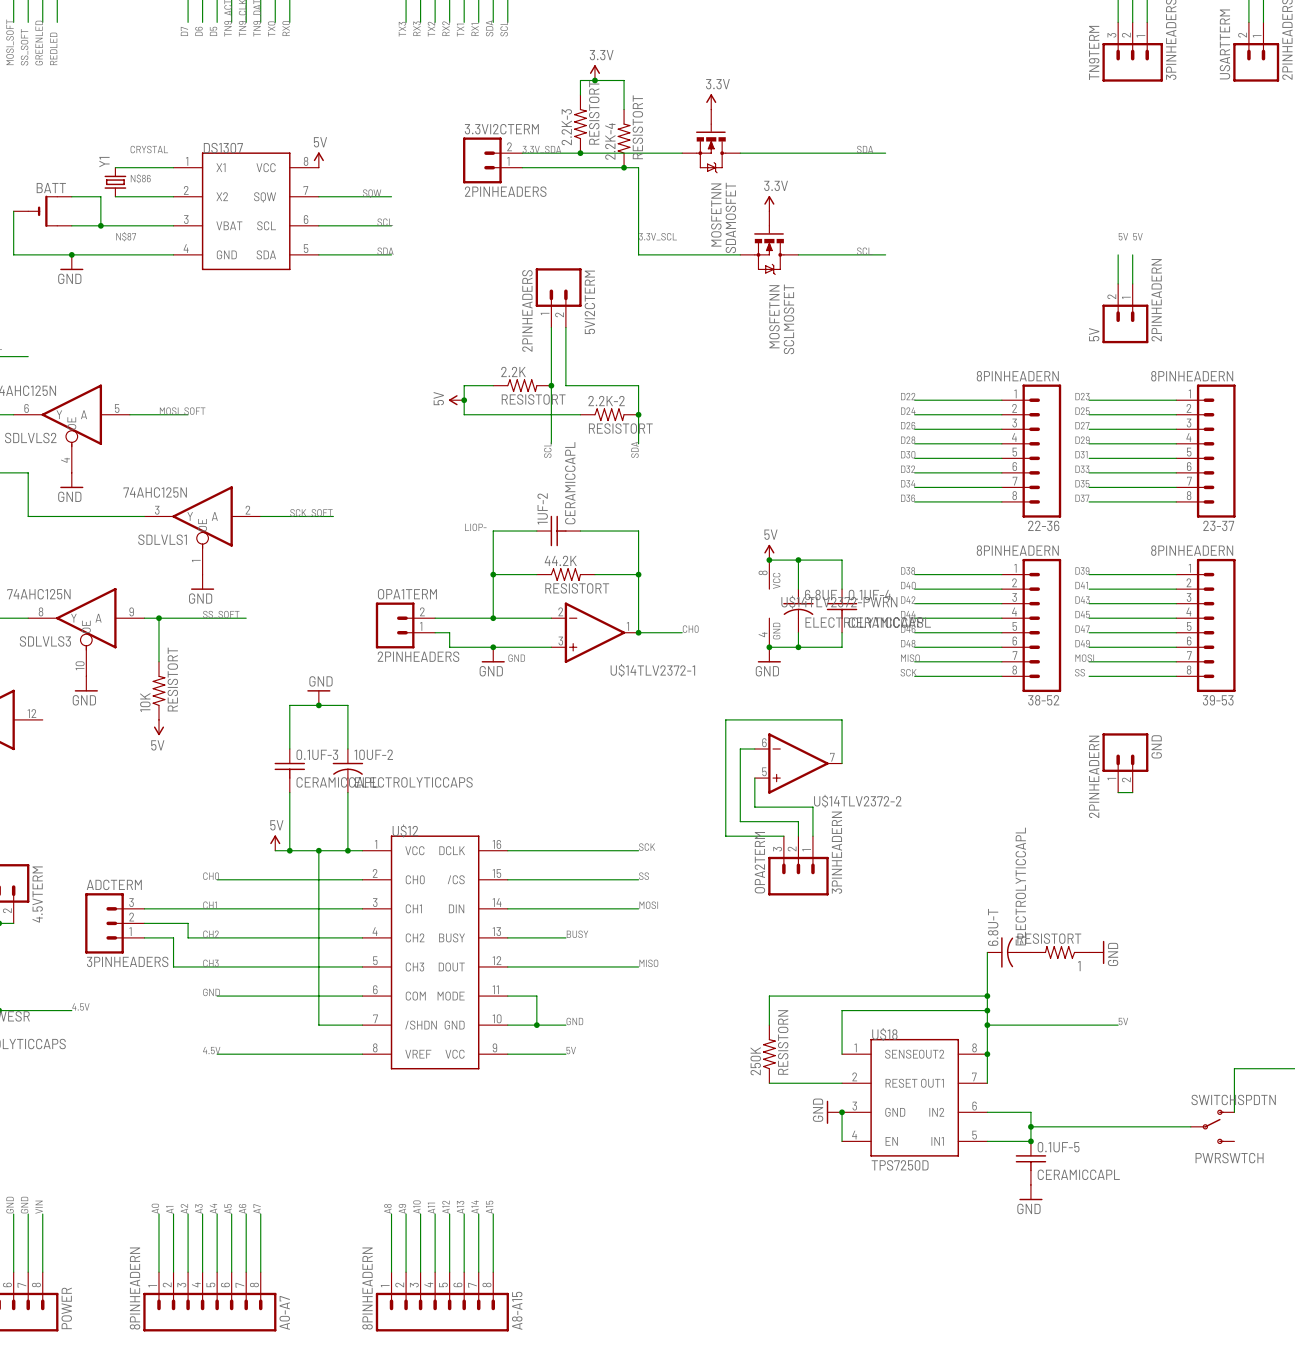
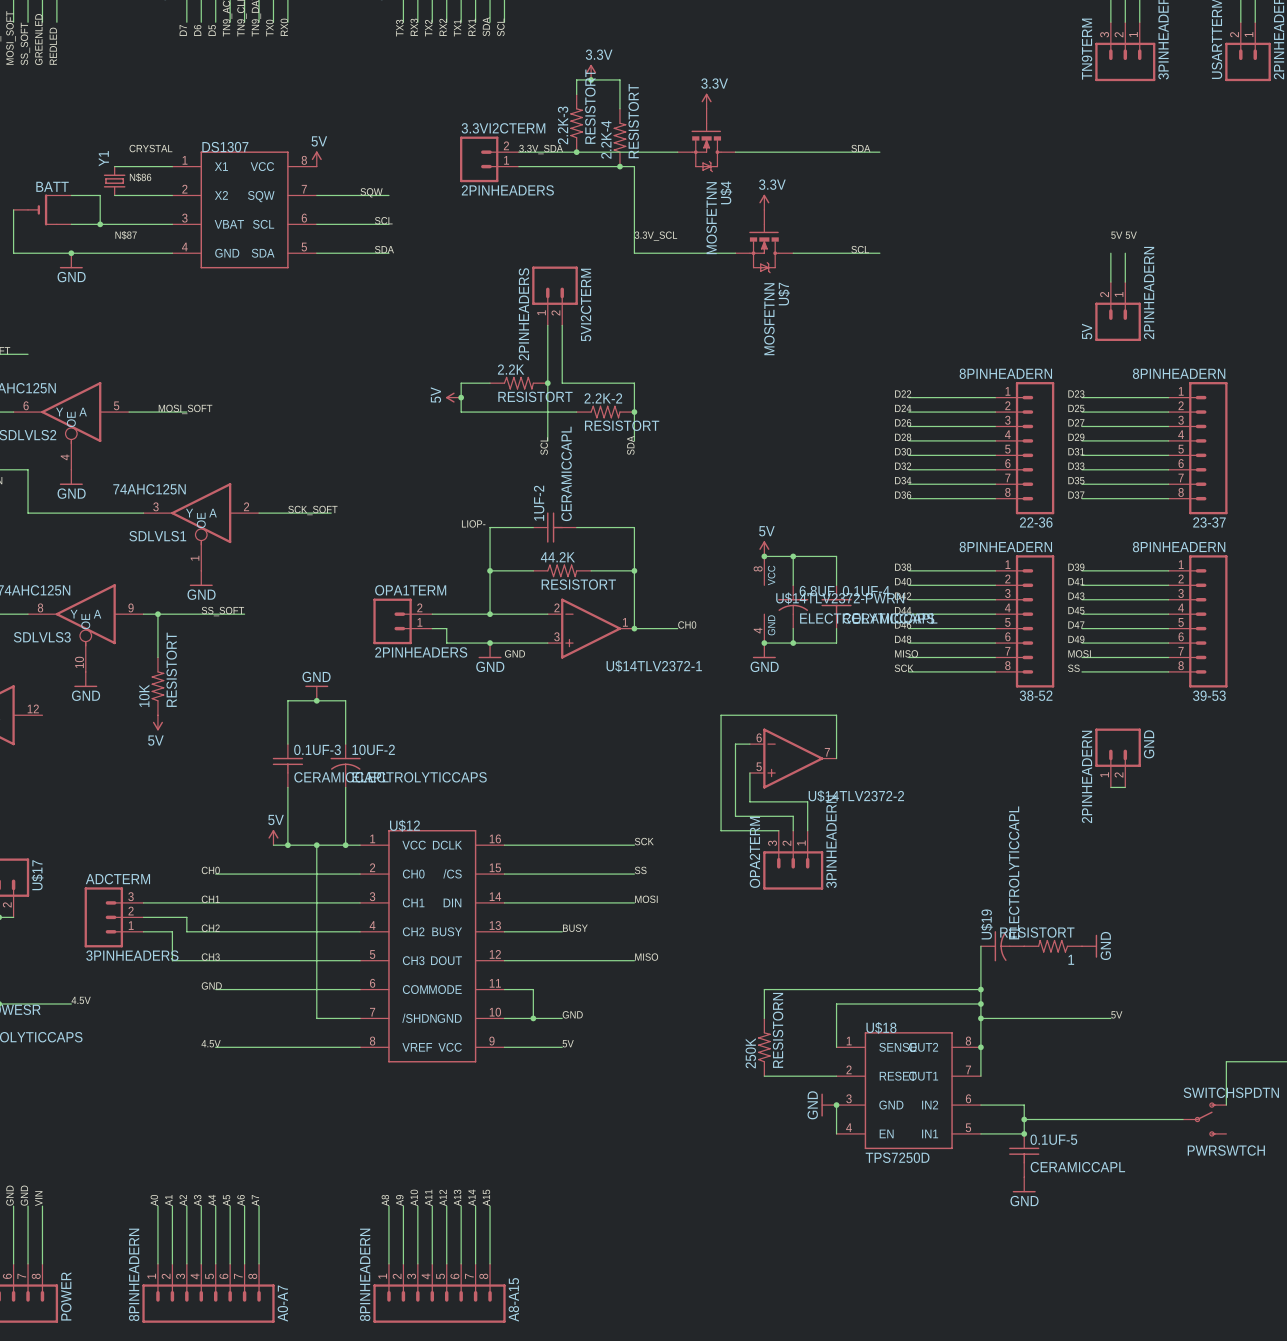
SDAMOSFET name: SDAMOSFET (730, 217) -> U$4 (726, 192)
SCLMOSFET name: SCLMOSFET (788, 319) -> U$7 (783, 294)
4.5VTERM name: 4.5VTERM (37, 894) -> U$17 (37, 875)
6.8U-T name: 6.8U-T (993, 927) -> U$19 (986, 924)

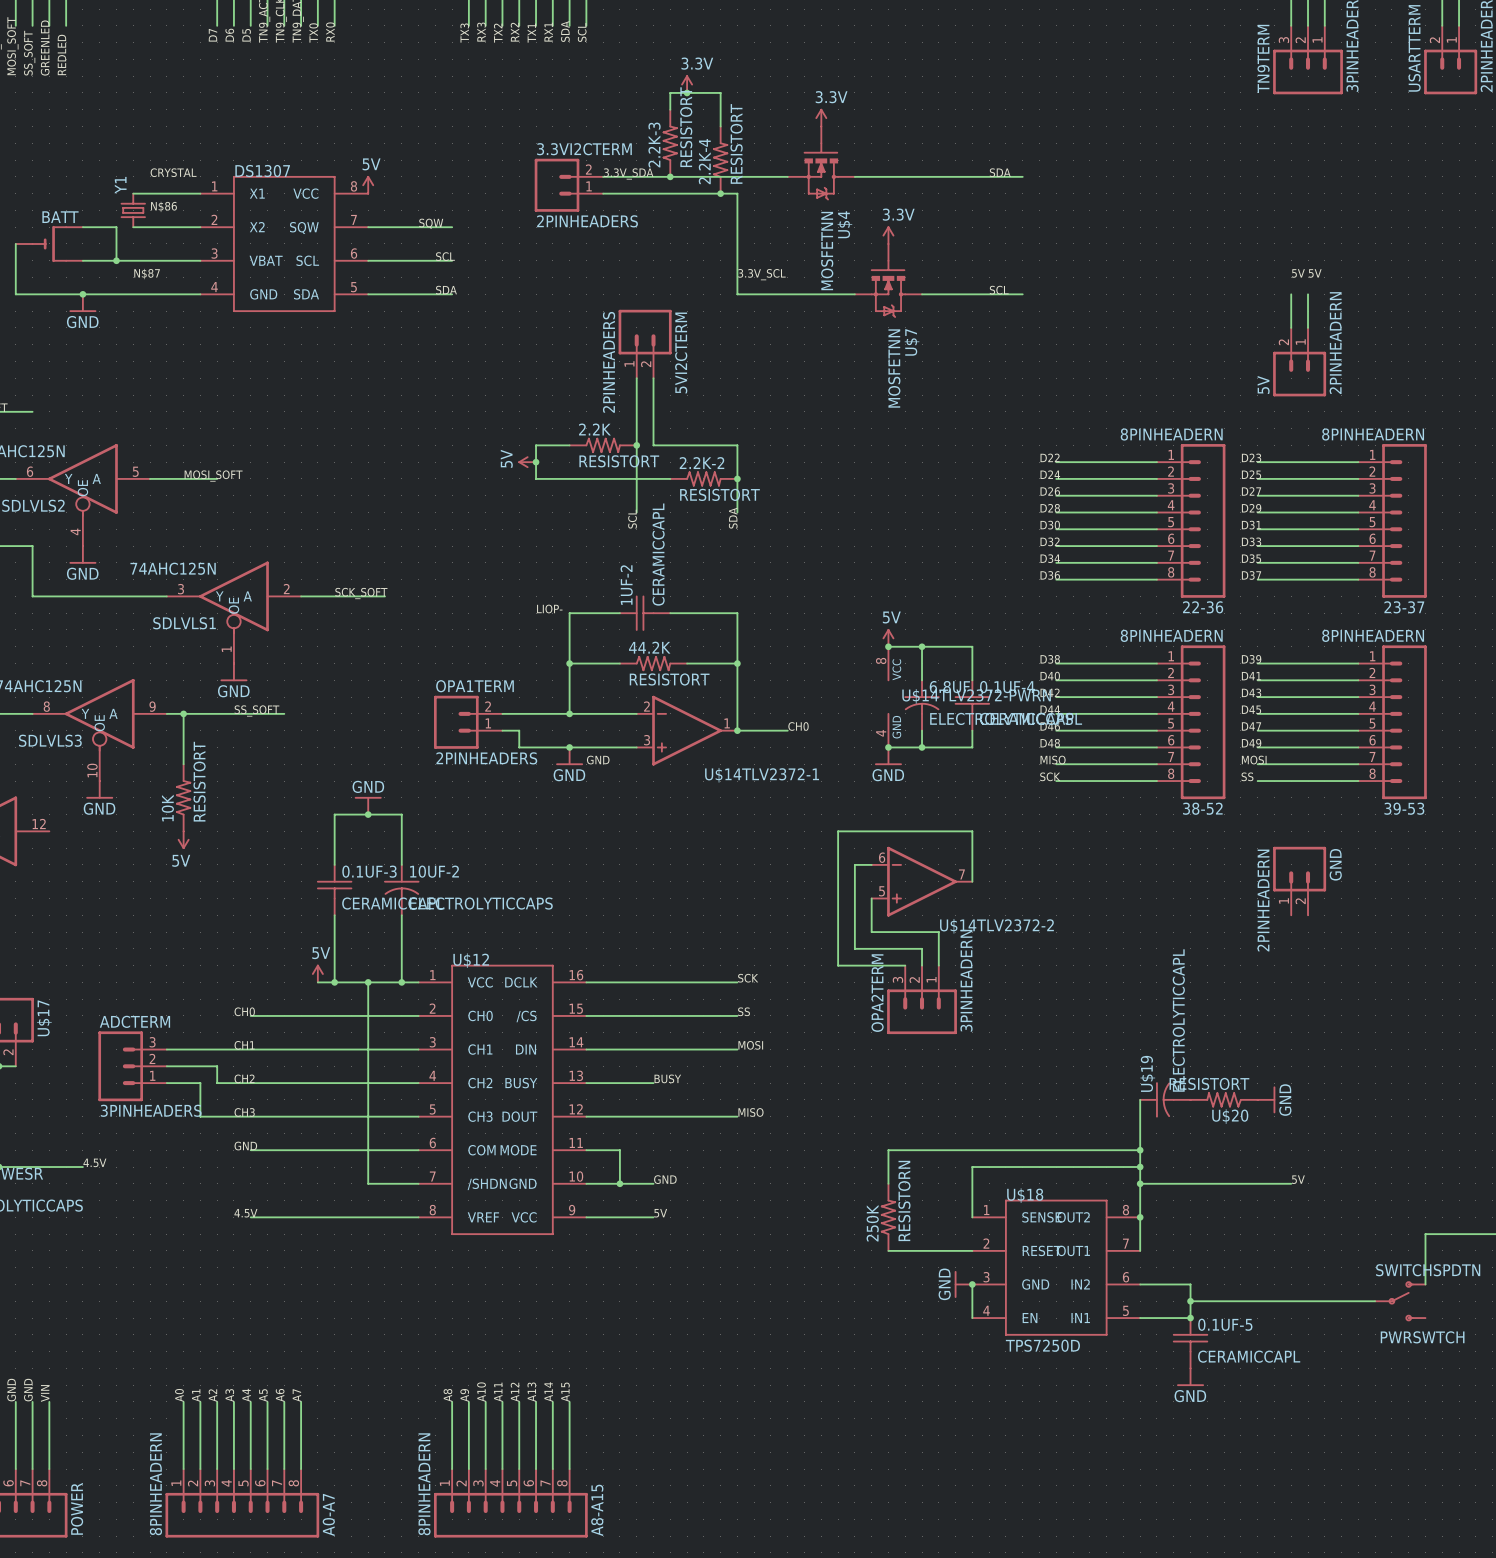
wire: (1110, 787) (1125, 787) -> none
1 name: 1 (1071, 959) -> U$20 (1230, 1116)

